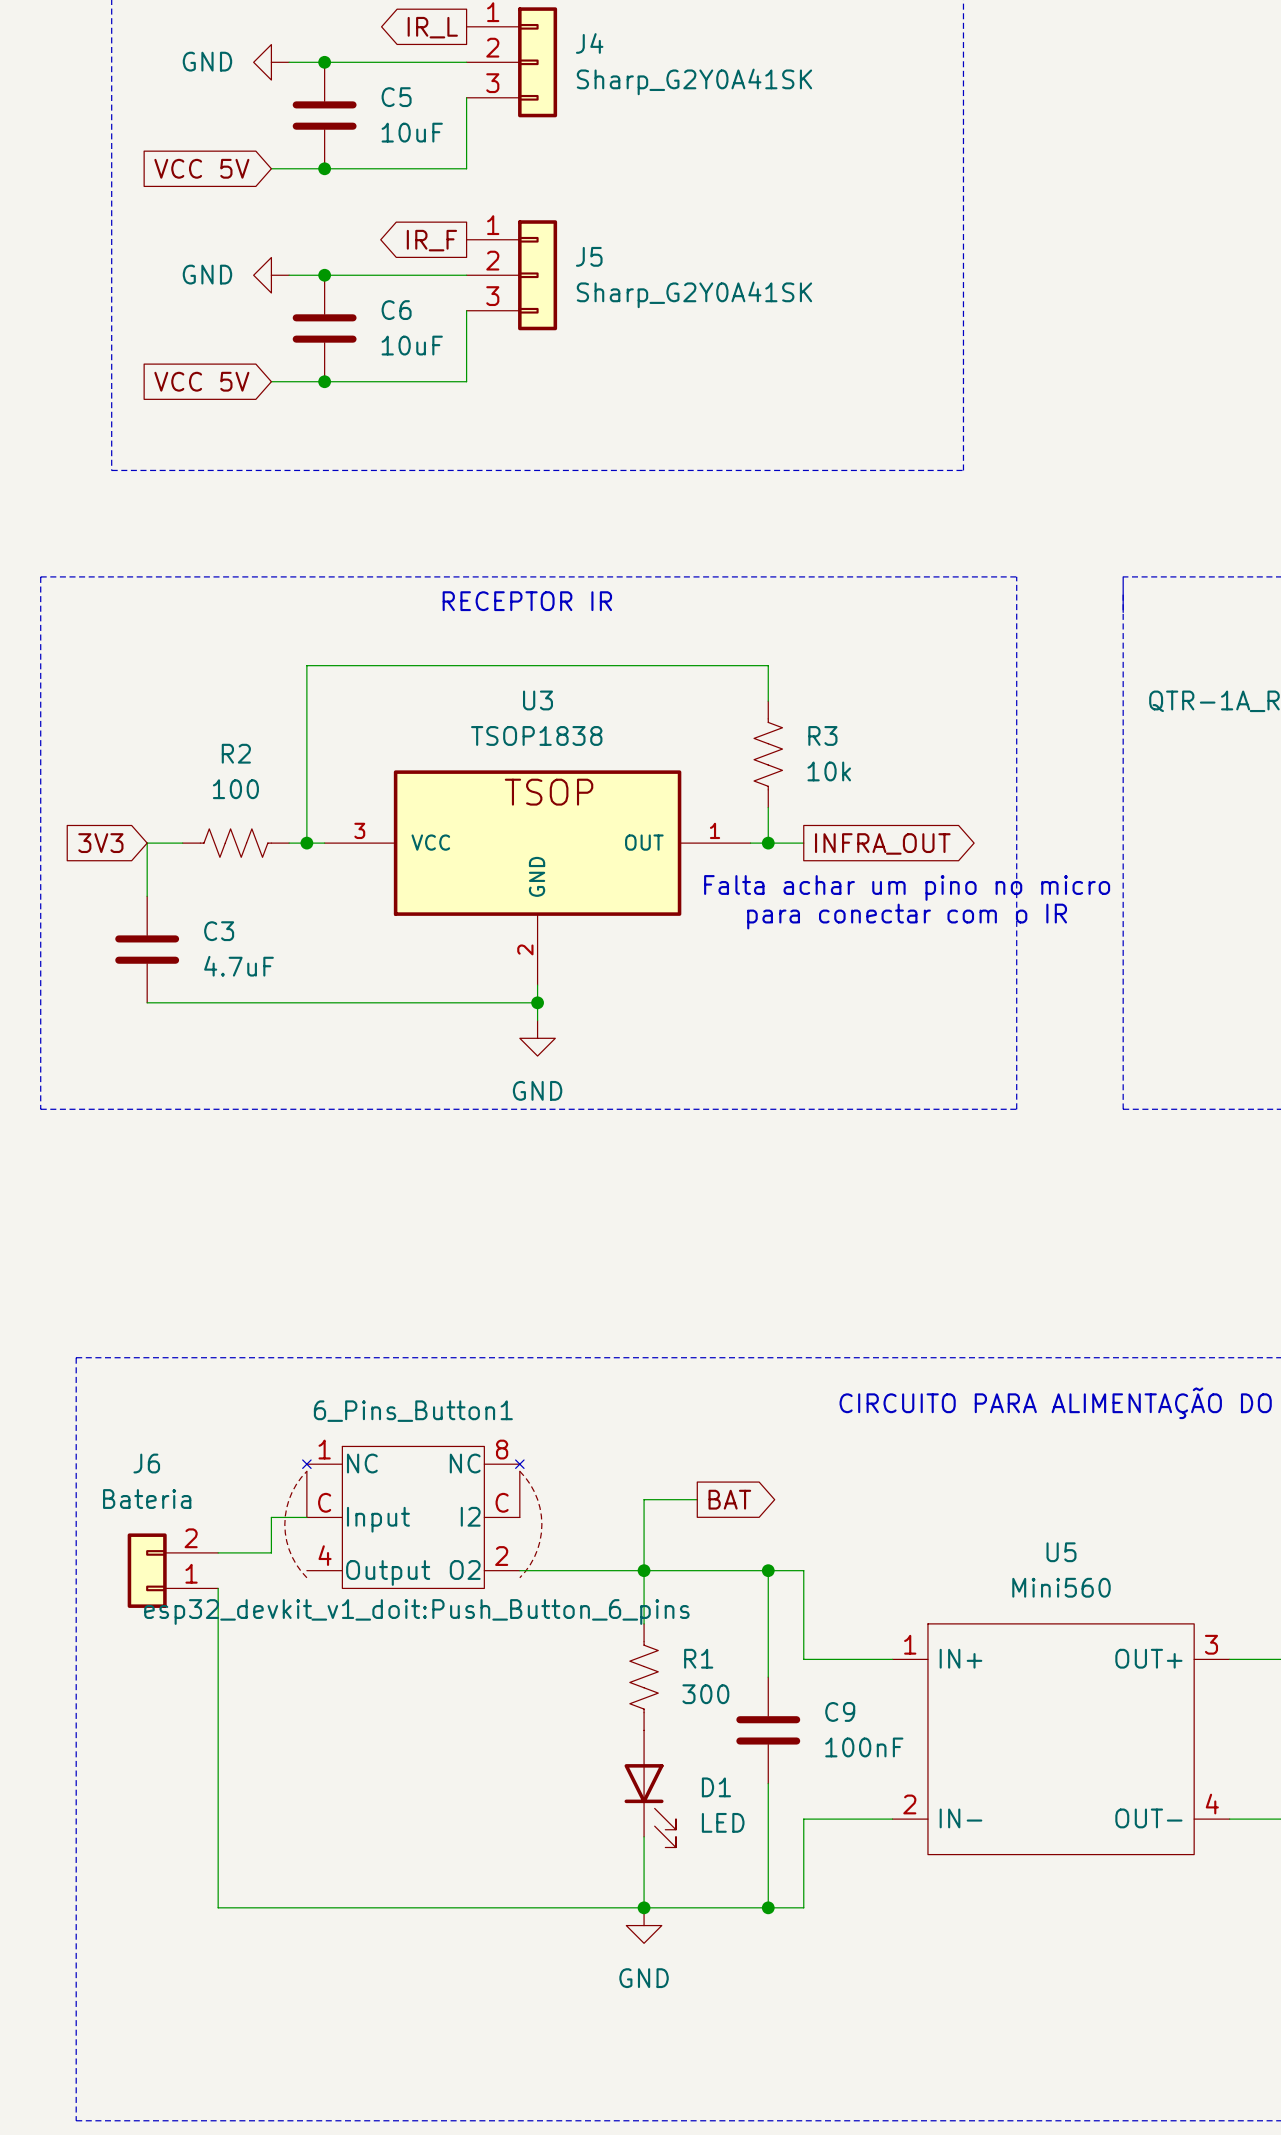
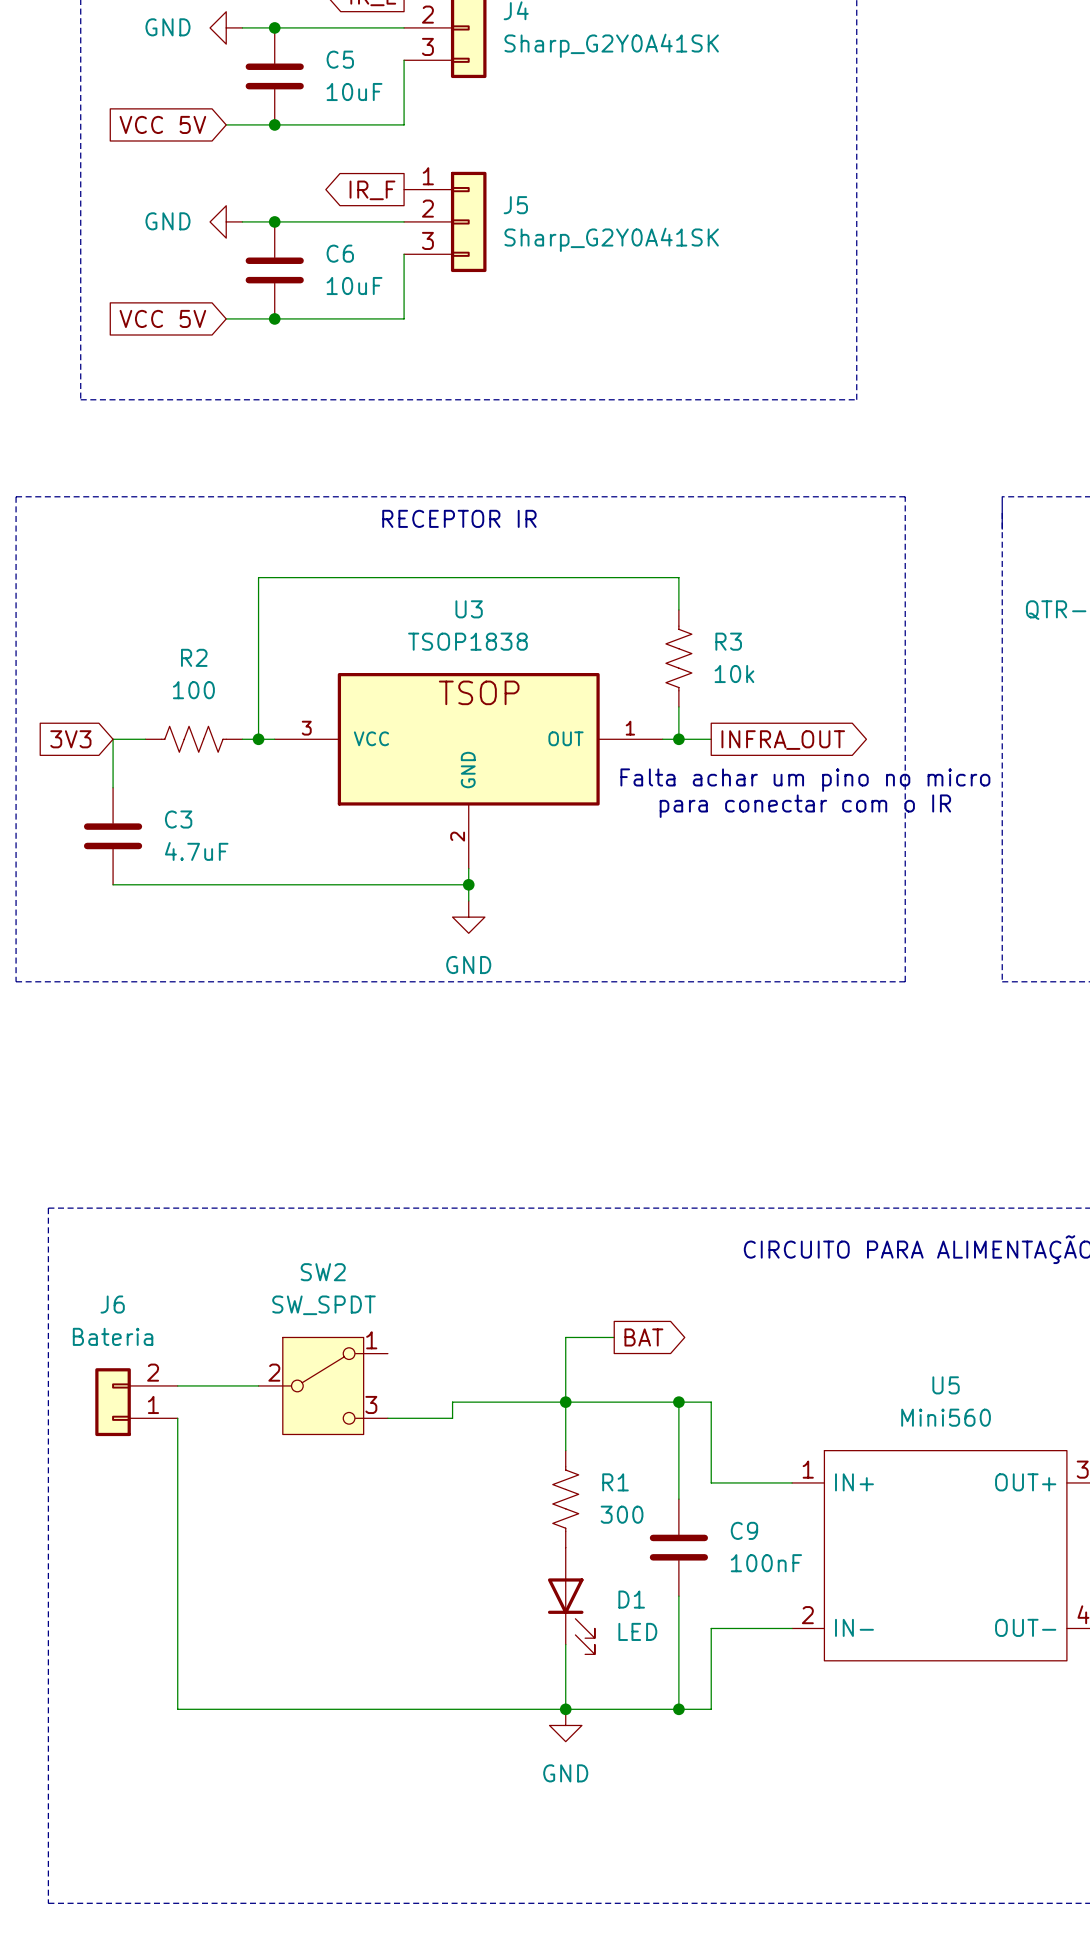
wire: (306, 1517) (271, 1517) (271, 1552) -> (258, 1385) (226, 1385)
6_Pins_Button1: (413, 1517) -> none
SW2: none -> SW_SPDT (323, 1385)
wire: none -> (452, 1402) (452, 1418) (387, 1418)

